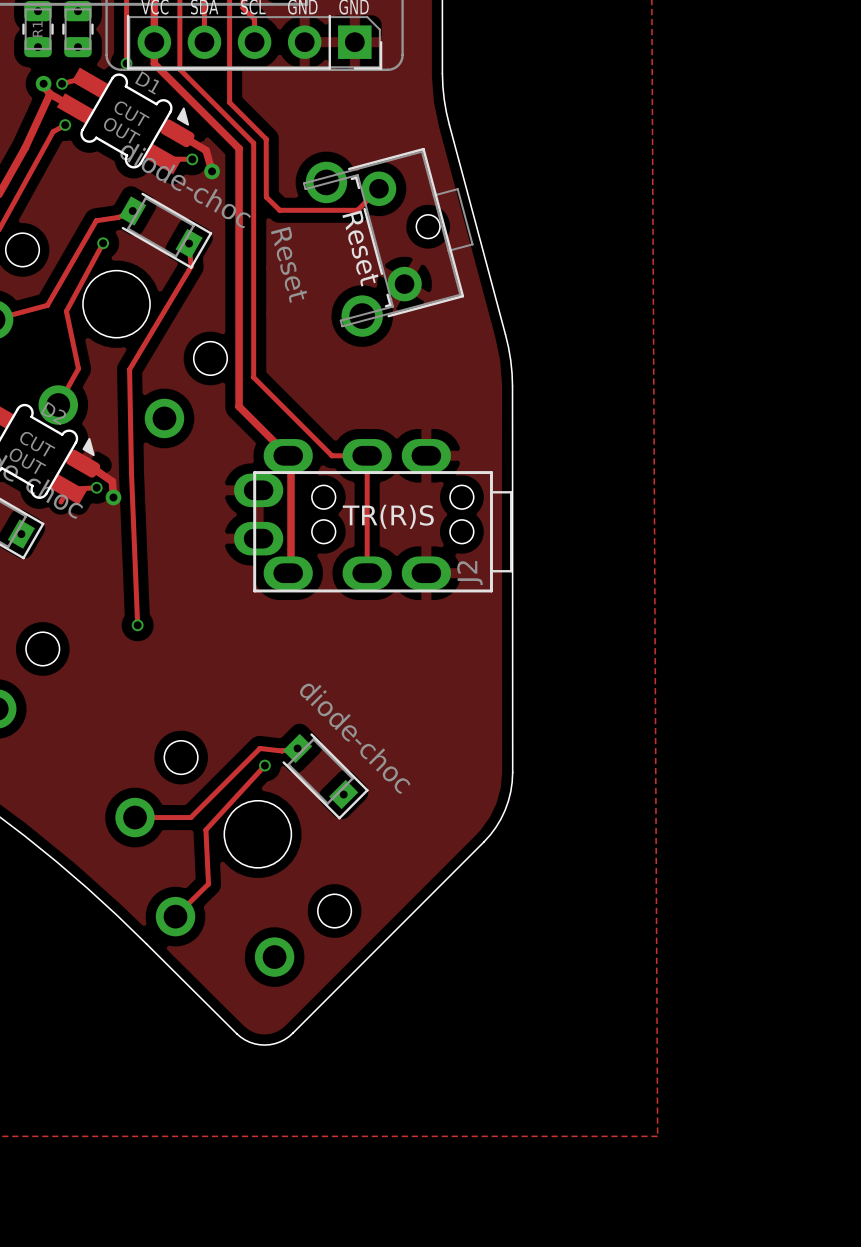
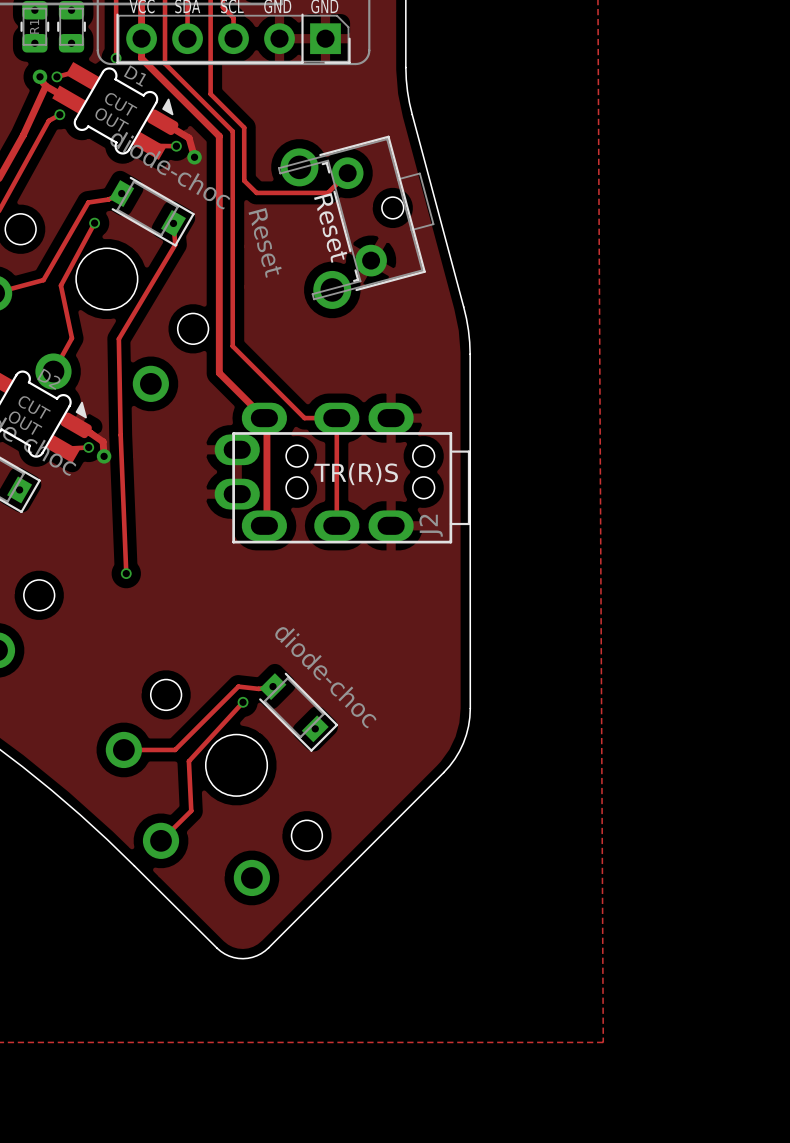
track: (68, 489) (60, 502) -> none

